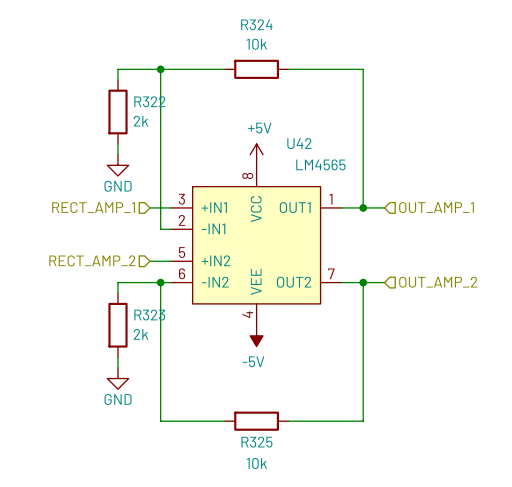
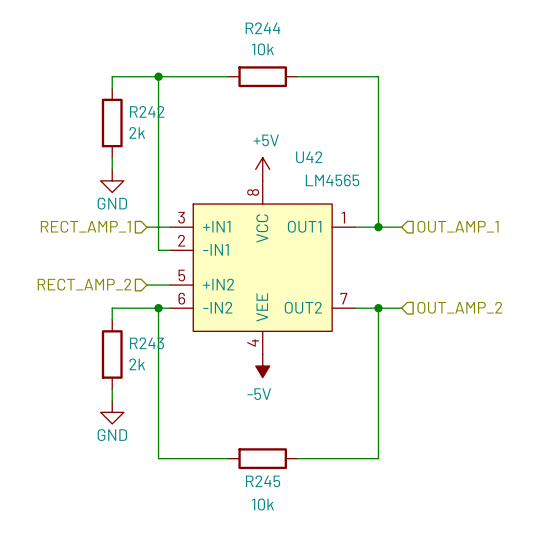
R324 name: R324 (256, 24) -> R244 (262, 28)
R322 name: R322 (149, 101) -> R242 (147, 111)
R323 name: R323 (149, 315) -> R243 (146, 343)
R325 name: R325 (256, 442) -> R245 (263, 481)

